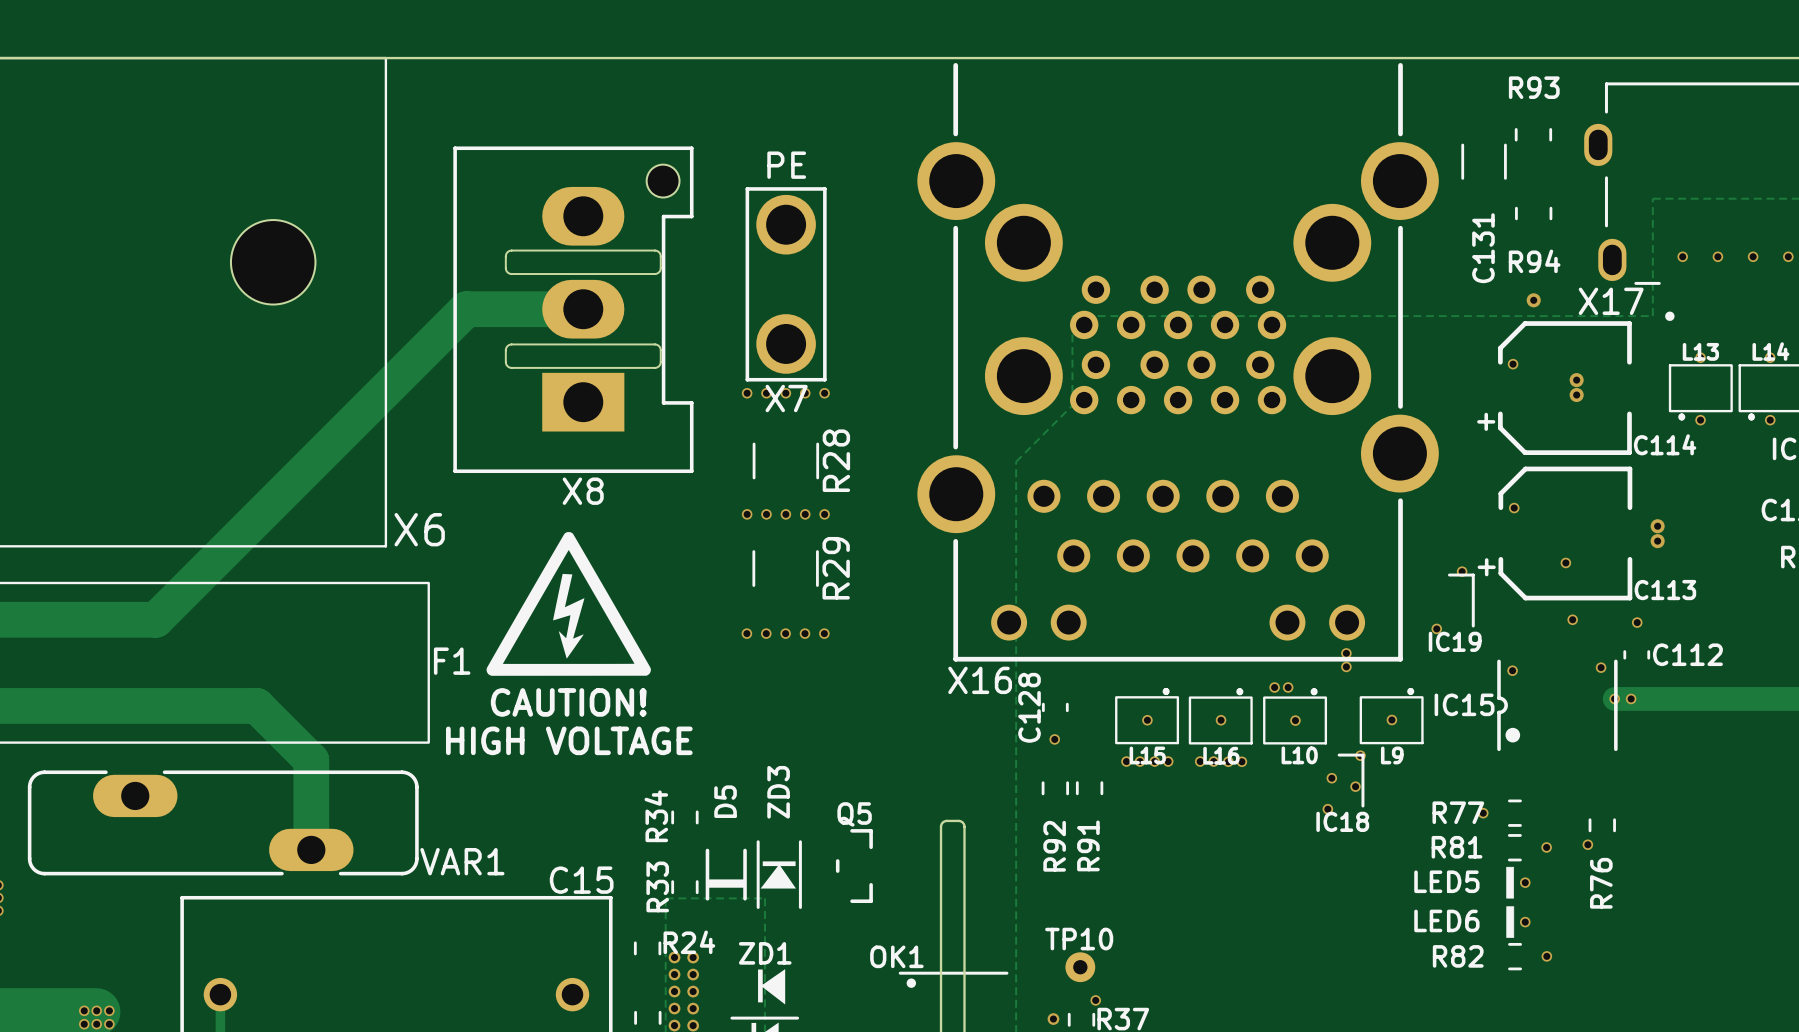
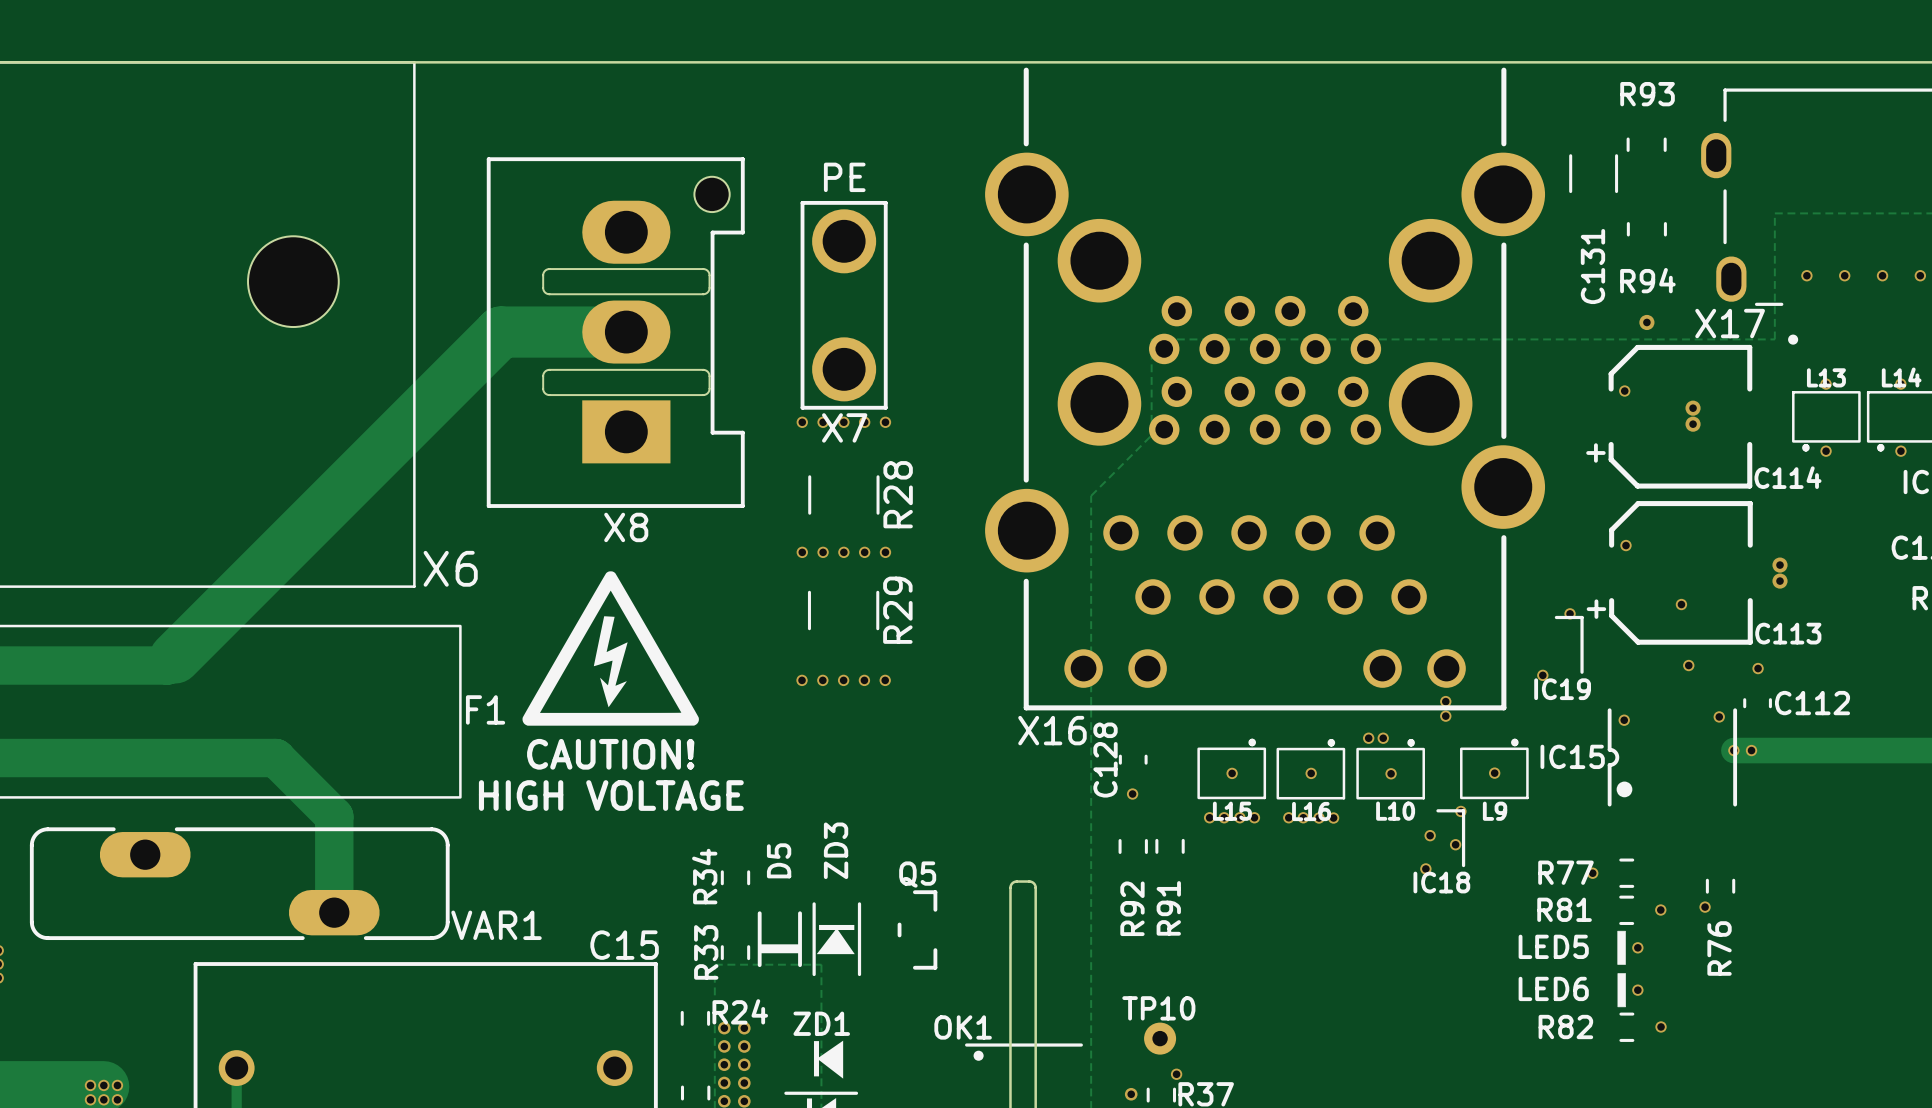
track width: thin (583, 309) (466, 309) (162, 612) -> thick (626, 332) (500, 332) (174, 657)

